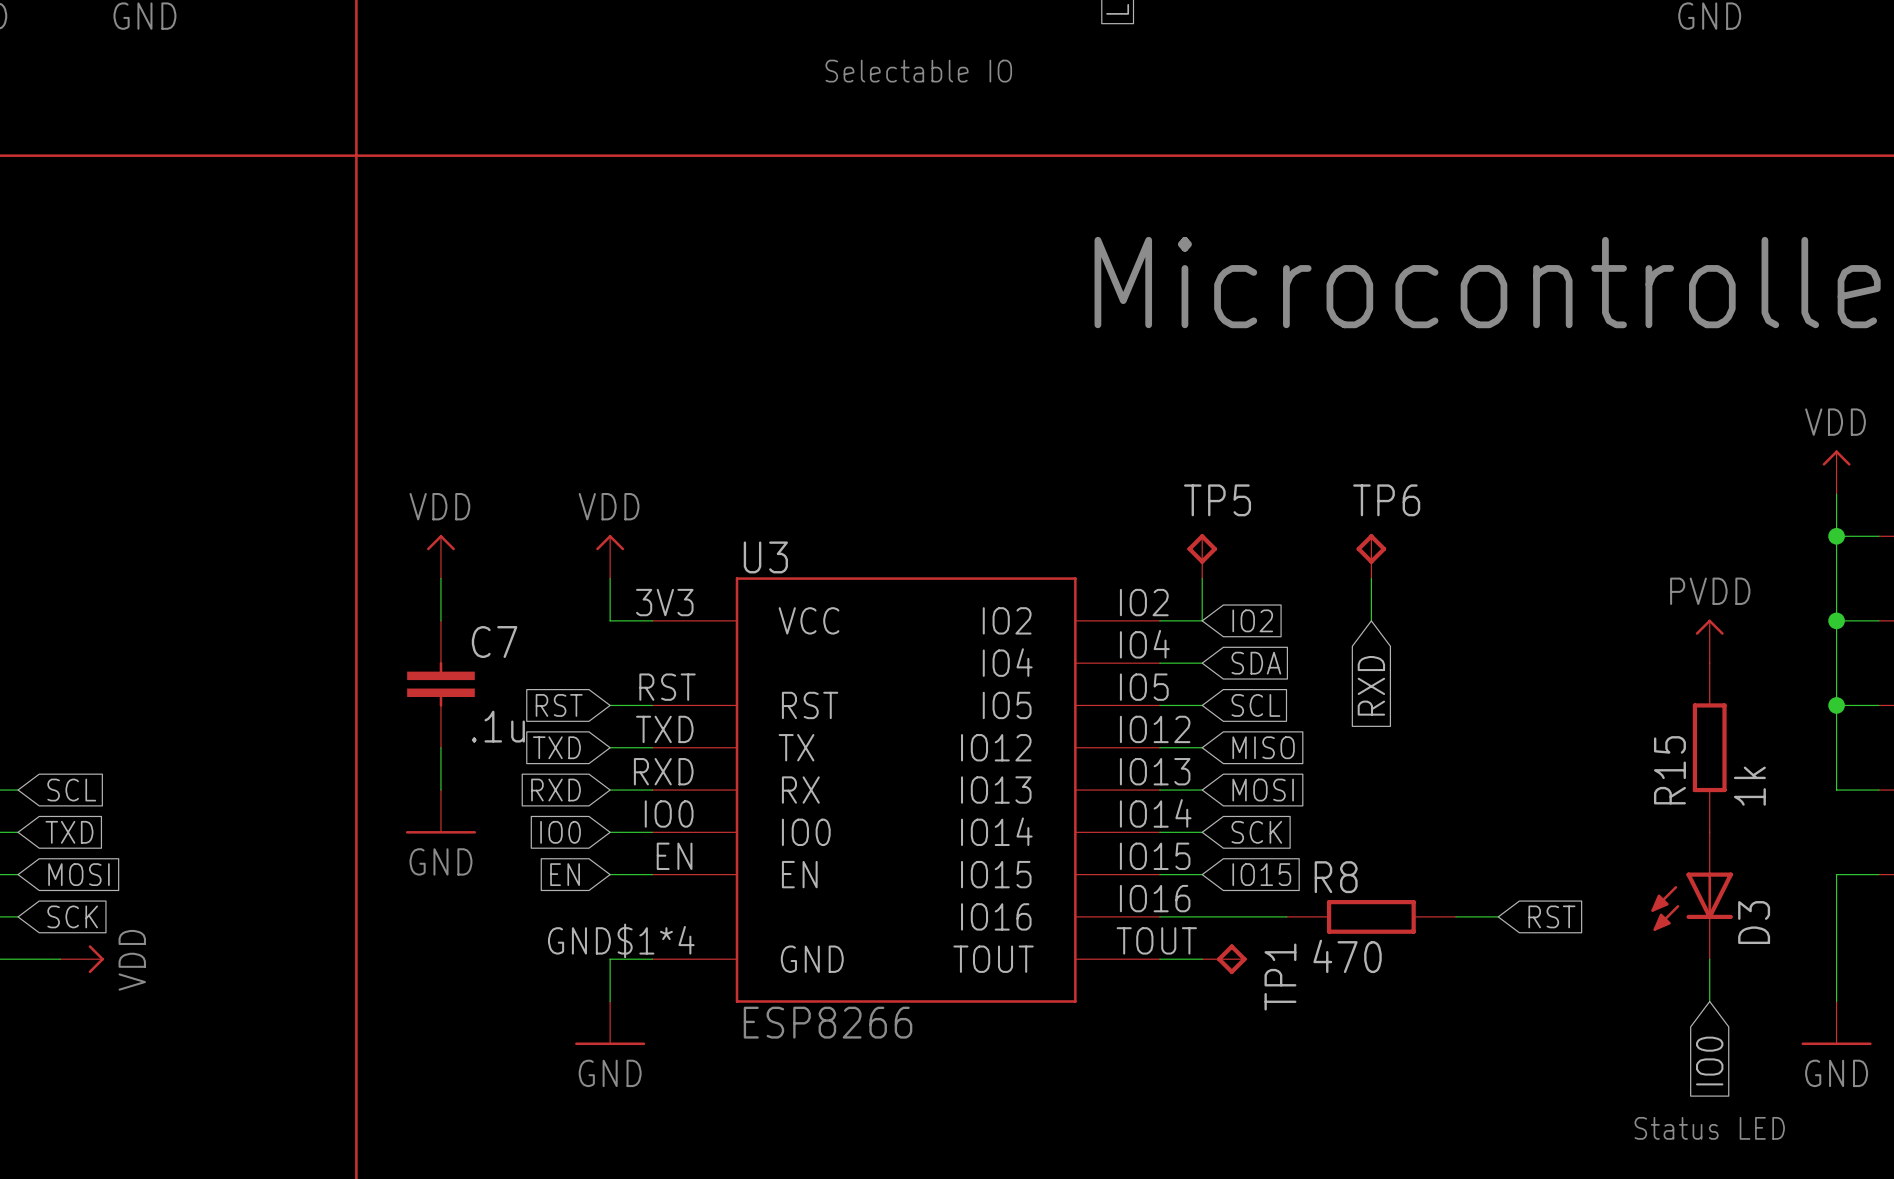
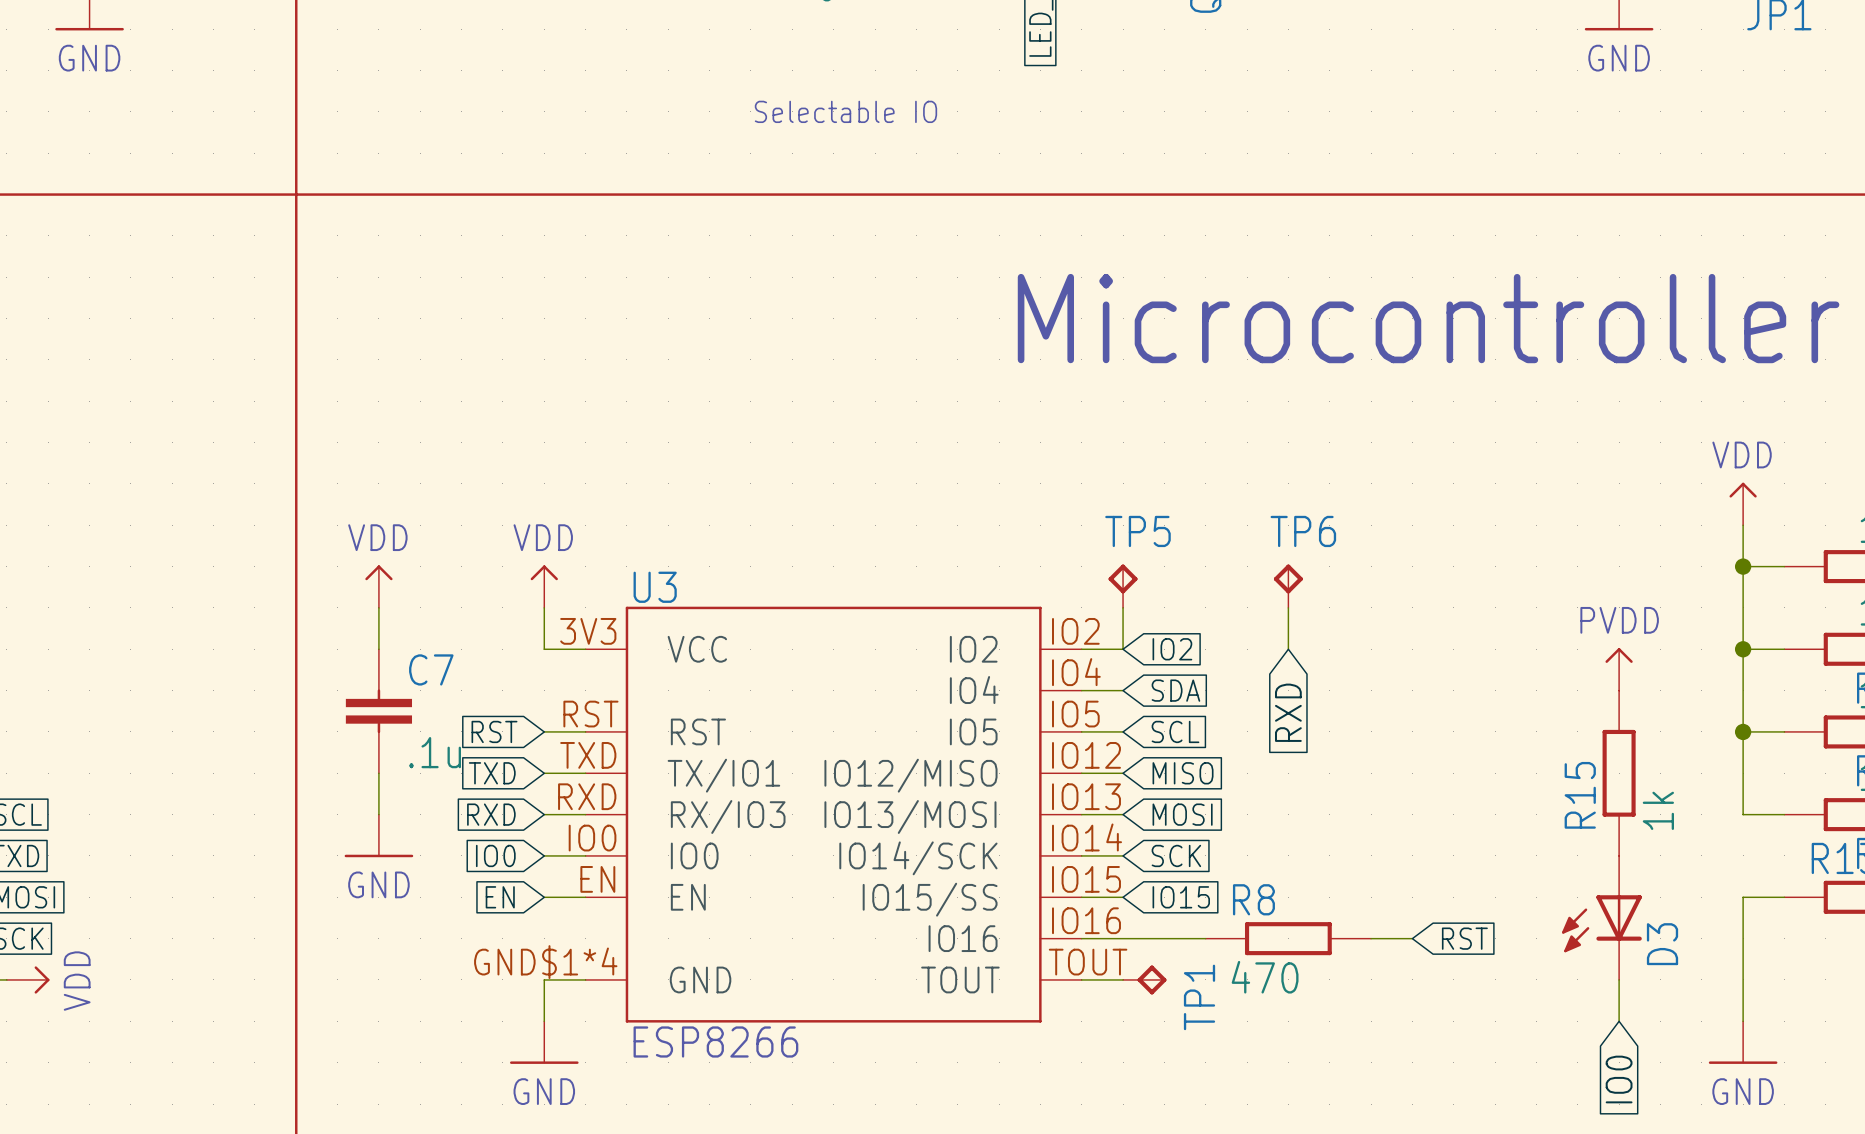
U3 name position: U3 (765, 557) -> U3 (655, 587)
U3 symbol: [652, 577, 1160, 1003] -> [585, 606, 1082, 1023]

